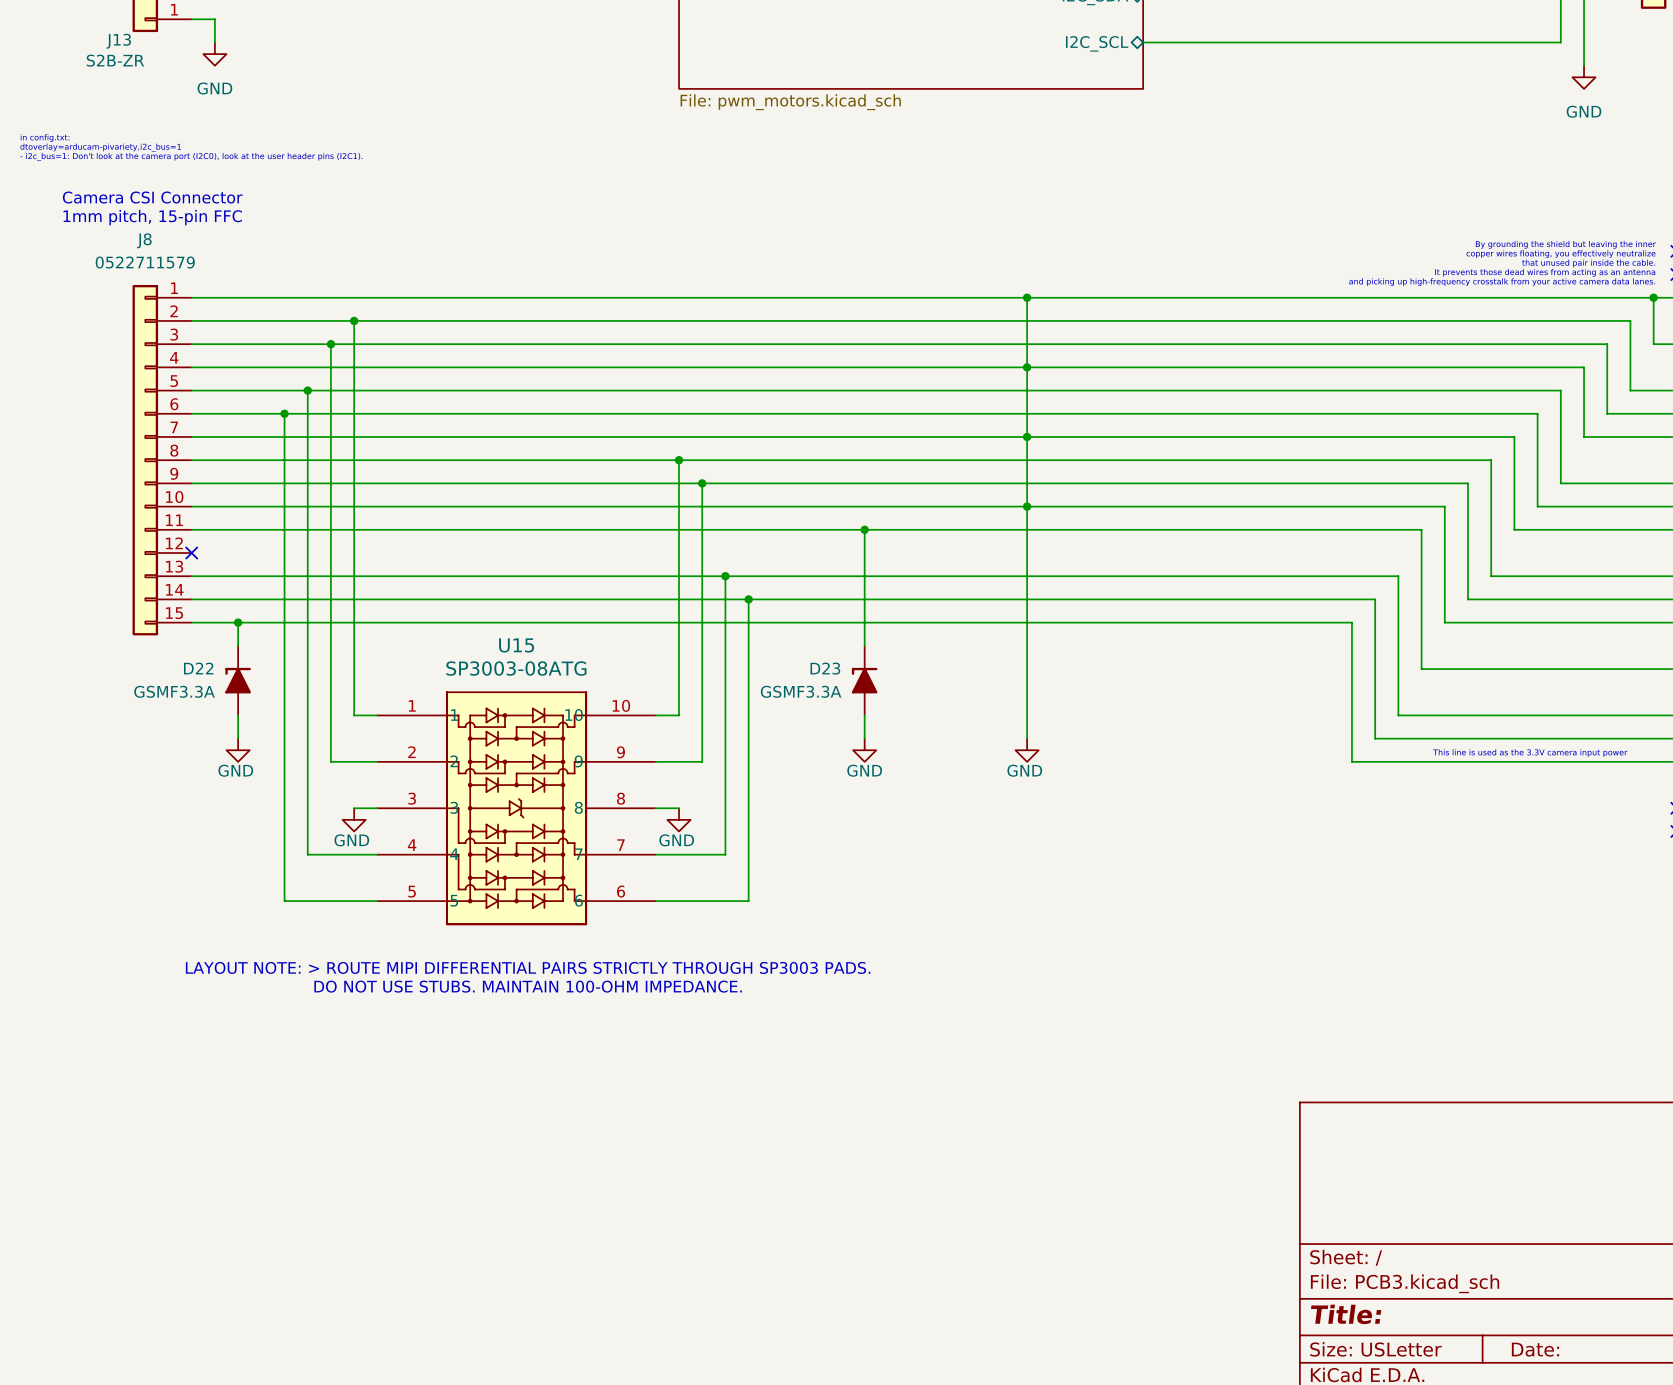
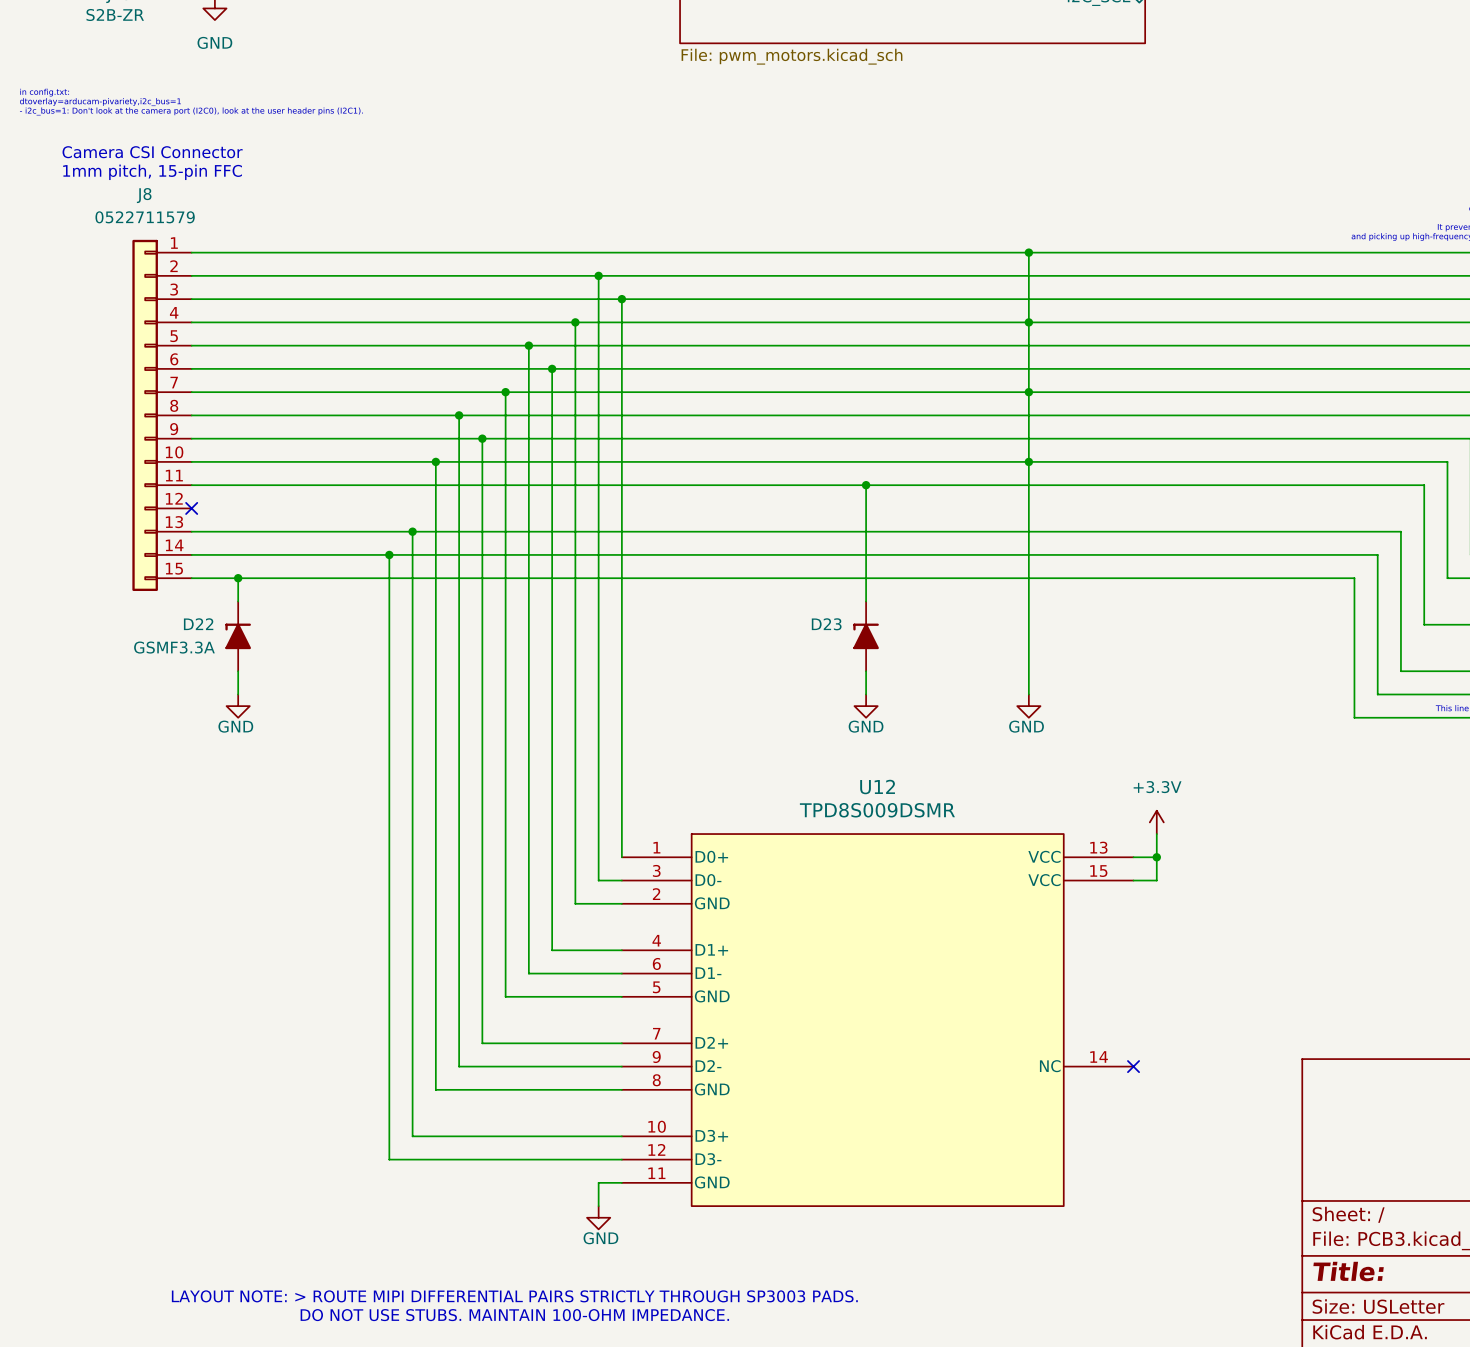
wire: (354, 320) (354, 715) (377, 715) -> none
junction: (354, 320) -> none
wire: none -> (598, 275) (598, 880) (621, 880)
junction: none -> (598, 275)
wire: (330, 344) (330, 761) (377, 761) -> none
junction: (330, 344) -> none
wire: none -> (621, 299) (621, 857)
junction: none -> (621, 299)
wire: none -> (575, 322) (575, 903) (621, 903)
junction: none -> (575, 322)
wire: (307, 390) (307, 854) (377, 854) -> none
junction: (307, 390) -> none
wire: none -> (528, 345) (528, 973) (621, 973)
junction: none -> (528, 345)
wire: (284, 413) (284, 901) (377, 901) -> none
junction: (284, 413) -> none
wire: none -> (552, 368) (552, 950) (621, 950)
junction: none -> (552, 368)
wire: none -> (505, 392) (505, 996) (621, 996)
junction: none -> (505, 392)
wire: none -> (459, 415) (459, 1066) (621, 1066)
junction: none -> (459, 415)
wire: (679, 460) (679, 715) (655, 715) -> none
junction: (679, 460) -> none
wire: none -> (482, 438) (482, 1043) (621, 1043)
junction: none -> (482, 438)
wire: (702, 483) (702, 761) (655, 761) -> none
junction: (702, 483) -> none
wire: none -> (435, 461) (435, 1089) (621, 1089)
junction: none -> (435, 461)
wire: none -> (412, 531) (412, 1136) (621, 1136)
junction: none -> (412, 531)
wire: (725, 576) (725, 854) (655, 854) -> none
junction: (725, 576) -> none
wire: none -> (389, 554) (389, 1159) (621, 1159)
junction: none -> (389, 554)
wire: (748, 599) (748, 901) (655, 901) -> none
junction: (748, 599) -> none
D23 value: GSMF3.3A (801, 691) -> none
wire: (354, 808) (377, 808) -> none
U15: SP3003-08ATG (516, 808) -> none
wire: (655, 808) (679, 808) -> none
power symbol: GND (354, 819) -> none
power symbol: GND (679, 819) -> none
power symbol: none -> +3.3V (1156, 822)
wire: none -> (1156, 834) (1156, 880) (1133, 880)
wire: none -> (1133, 857) (1156, 857)
junction: none -> (1156, 857)
text: LAYOUT NOTE: > ROUTE MIPI DIFFERENTIAL PAIRS STRICTLY THROUGH SP3003 PADS. (528, 967) -> none
text: DO NOT USE STUBS. MAINTAIN 100-OHM IMPEDANCE. (528, 986) -> none
U12: none -> TPD8S009DSMR (877, 1020)
no-connect mark: none -> (1133, 1066)
wire: none -> (621, 1182) (598, 1182) (598, 1206)
power symbol: none -> GND (598, 1217)
text: none -> LAYOUT NOTE: > ROUTE MIPI DIFFERENTIAL PAIRS STRICTLY THROUGH SP3003 PADS. (514, 1296)
text: none -> DO NOT USE STUBS. MAINTAIN 100-OHM IMPEDANCE. (514, 1315)

